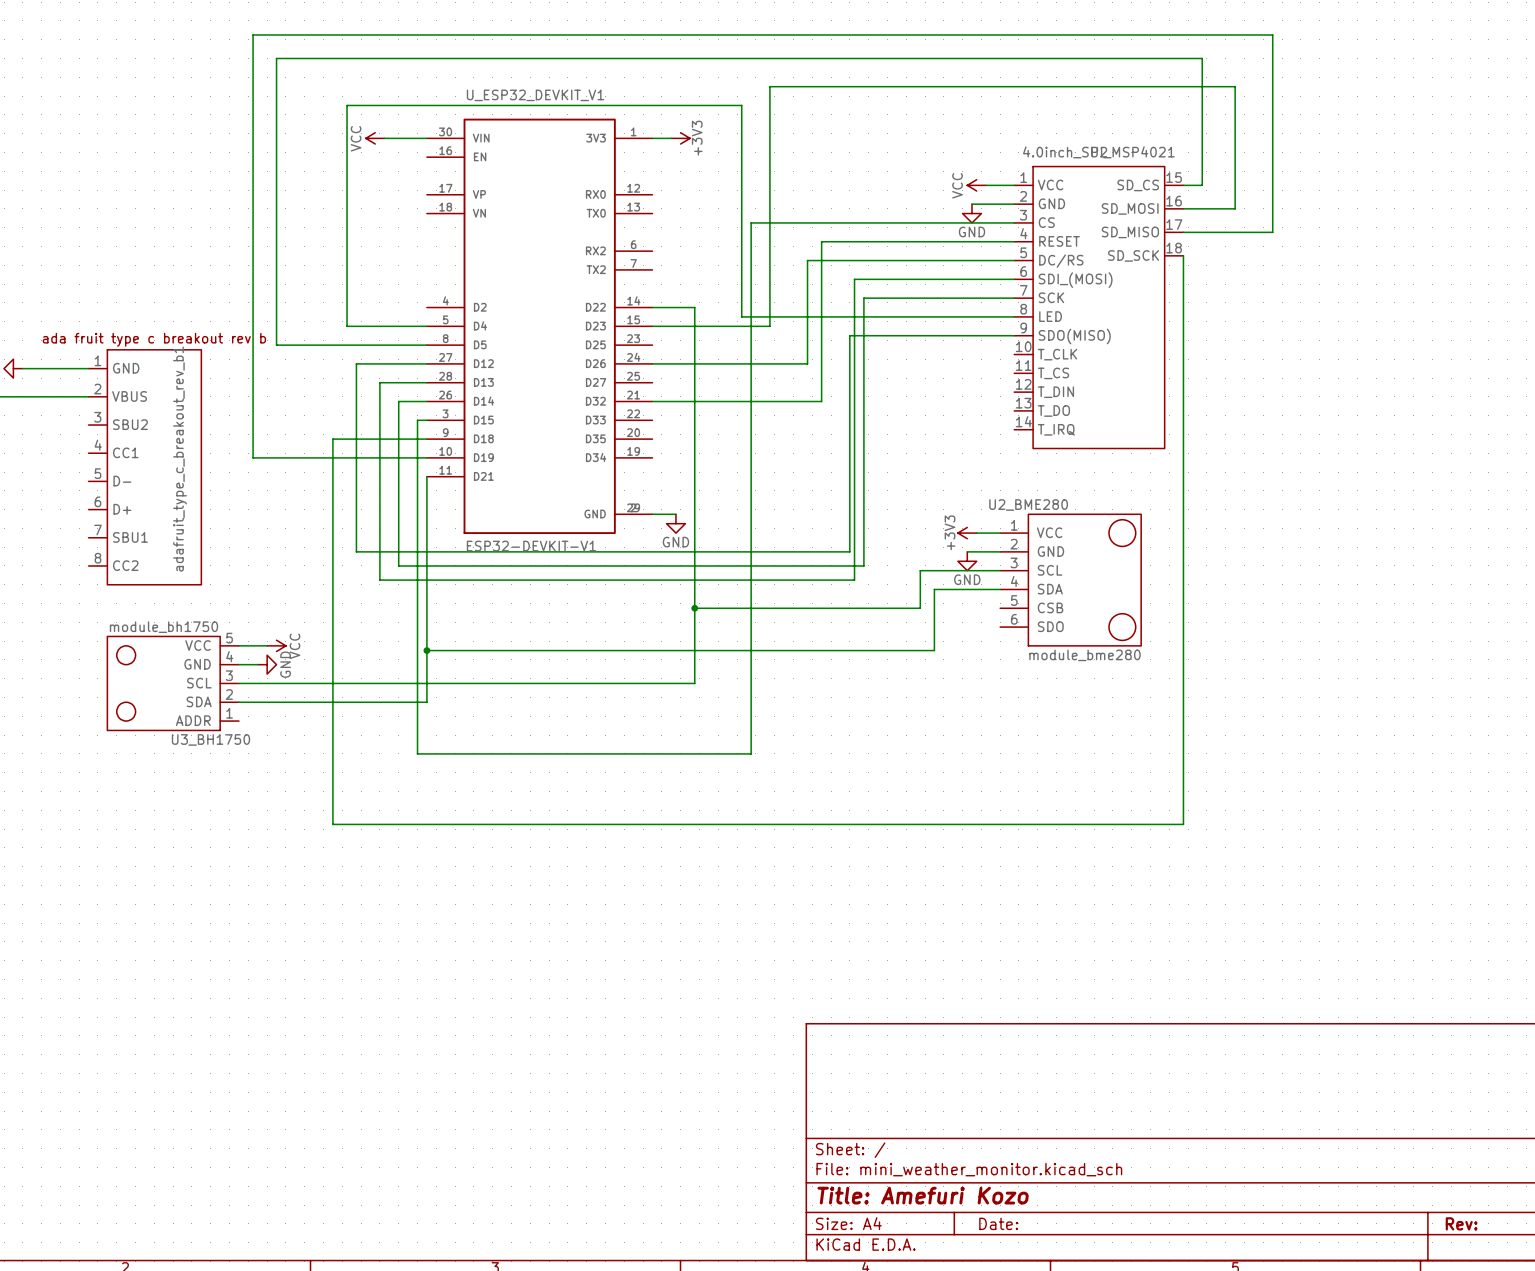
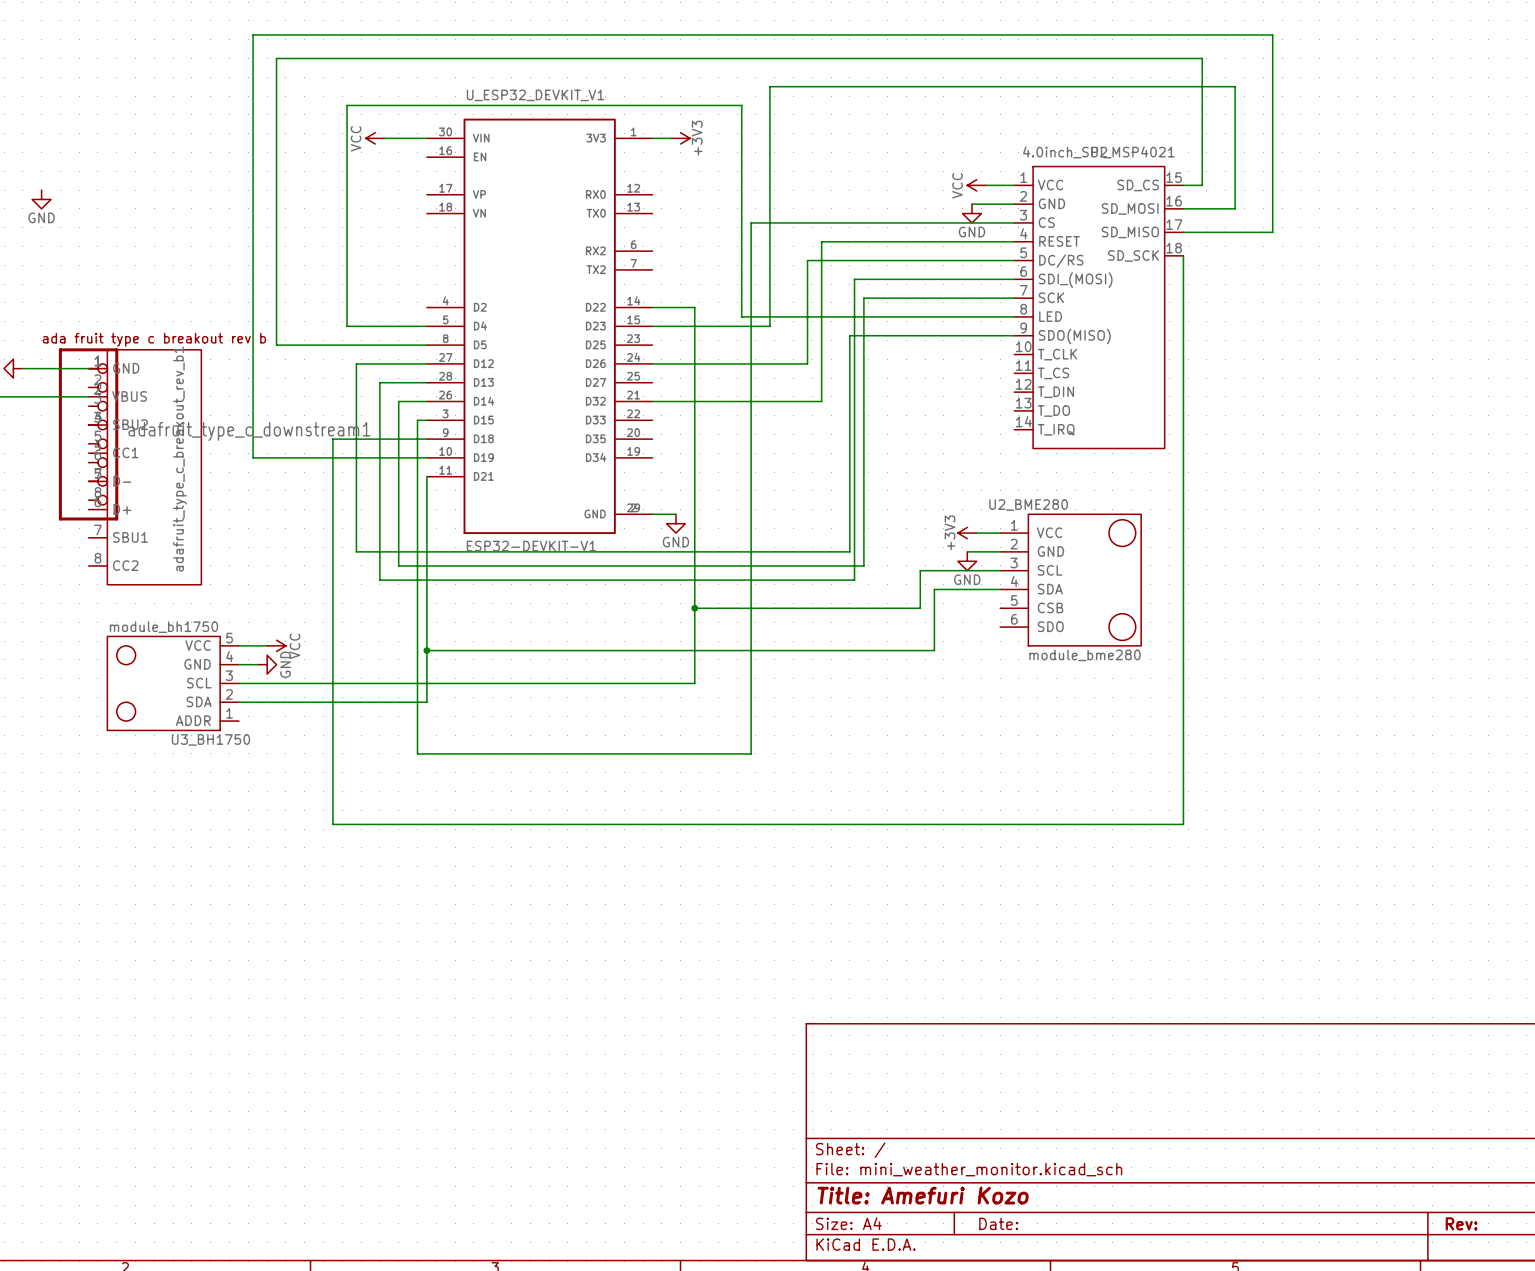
power symbol: none -> GND (41, 199)
adafruit_type_c_downstream1: none -> (88, 434)

